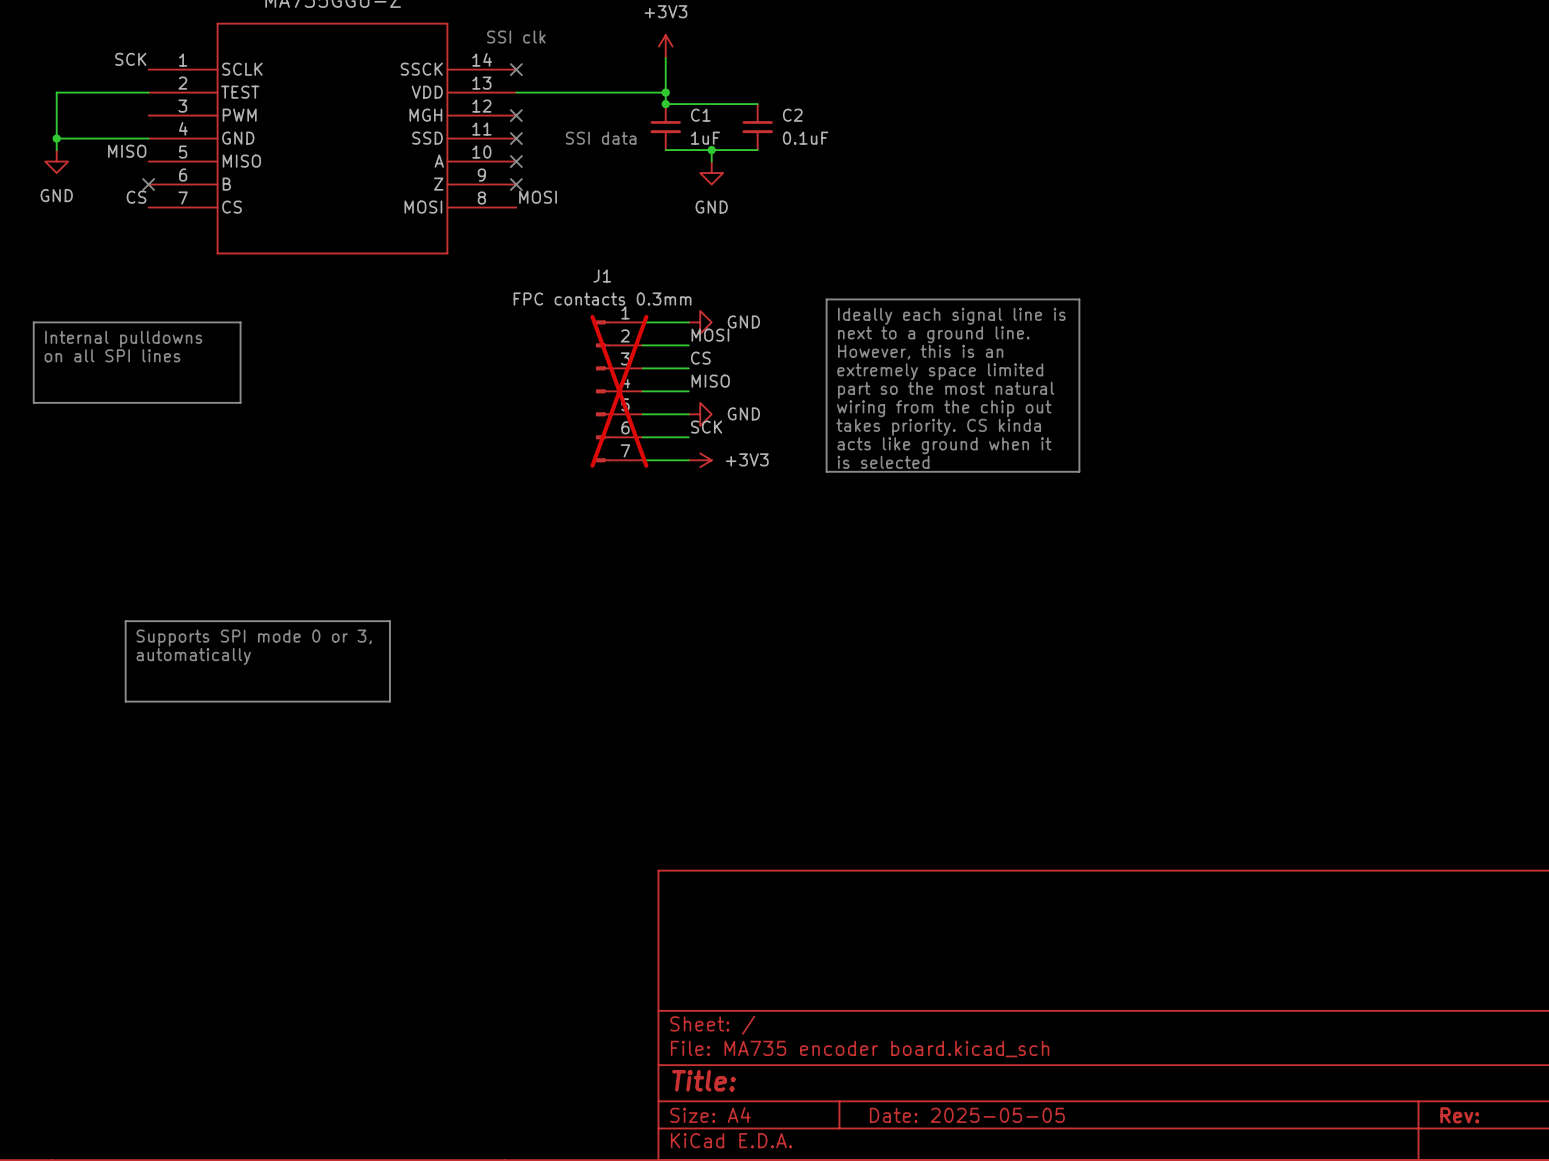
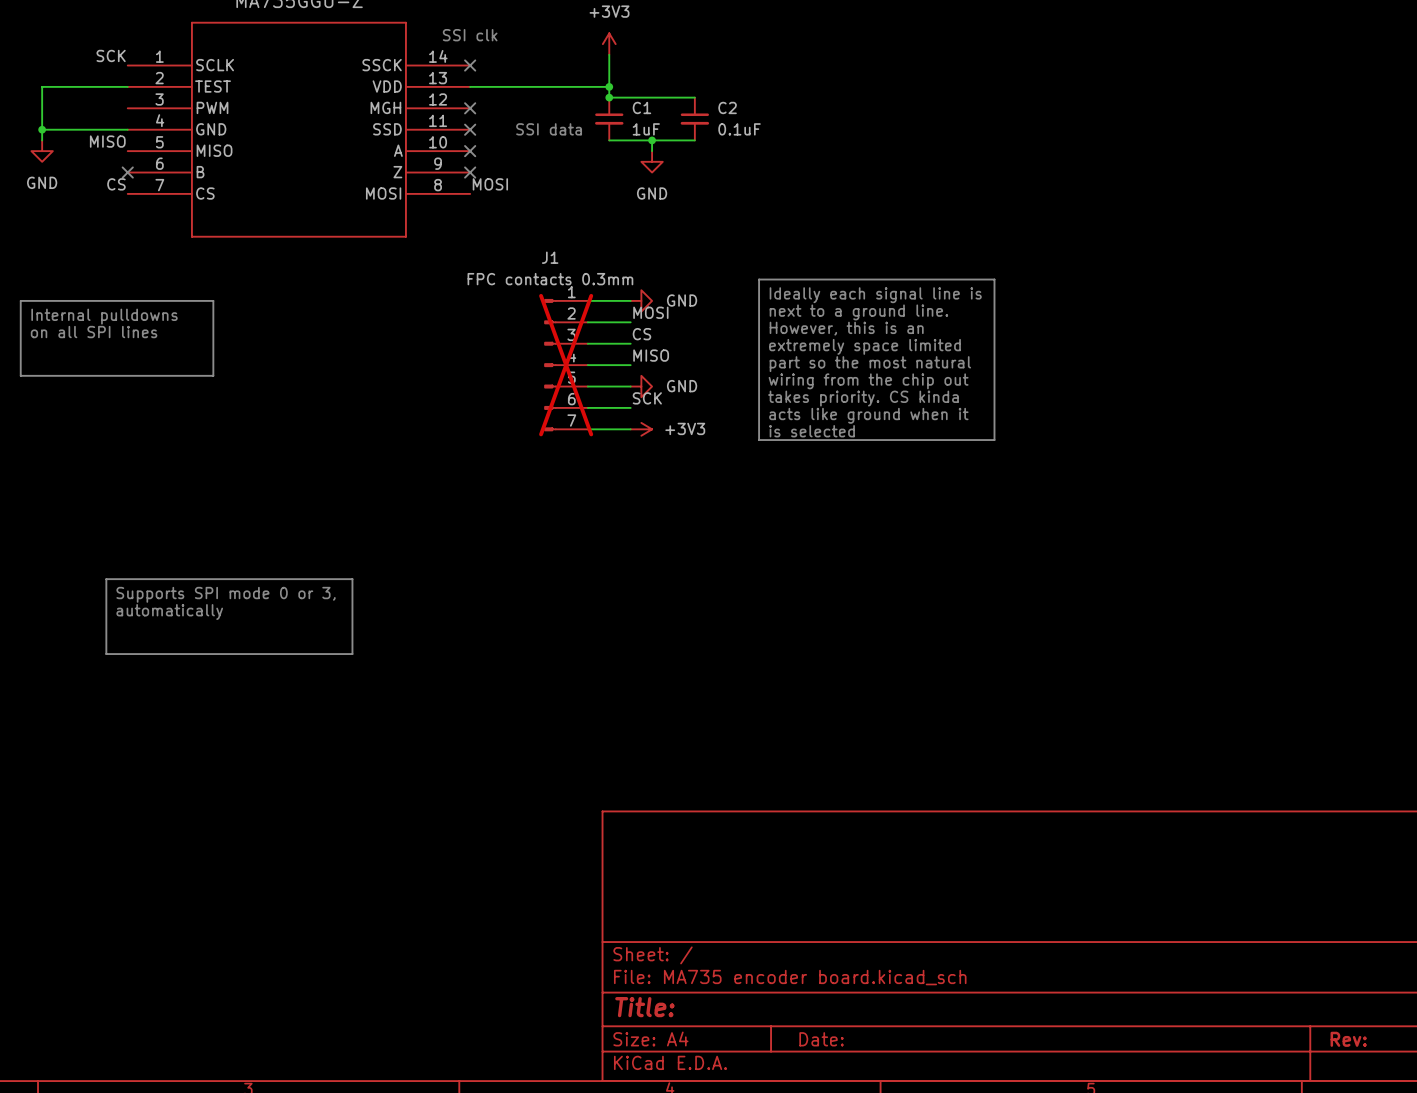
title block: Date: 2025-05-05 (967, 1115) -> Date: (821, 1039)

